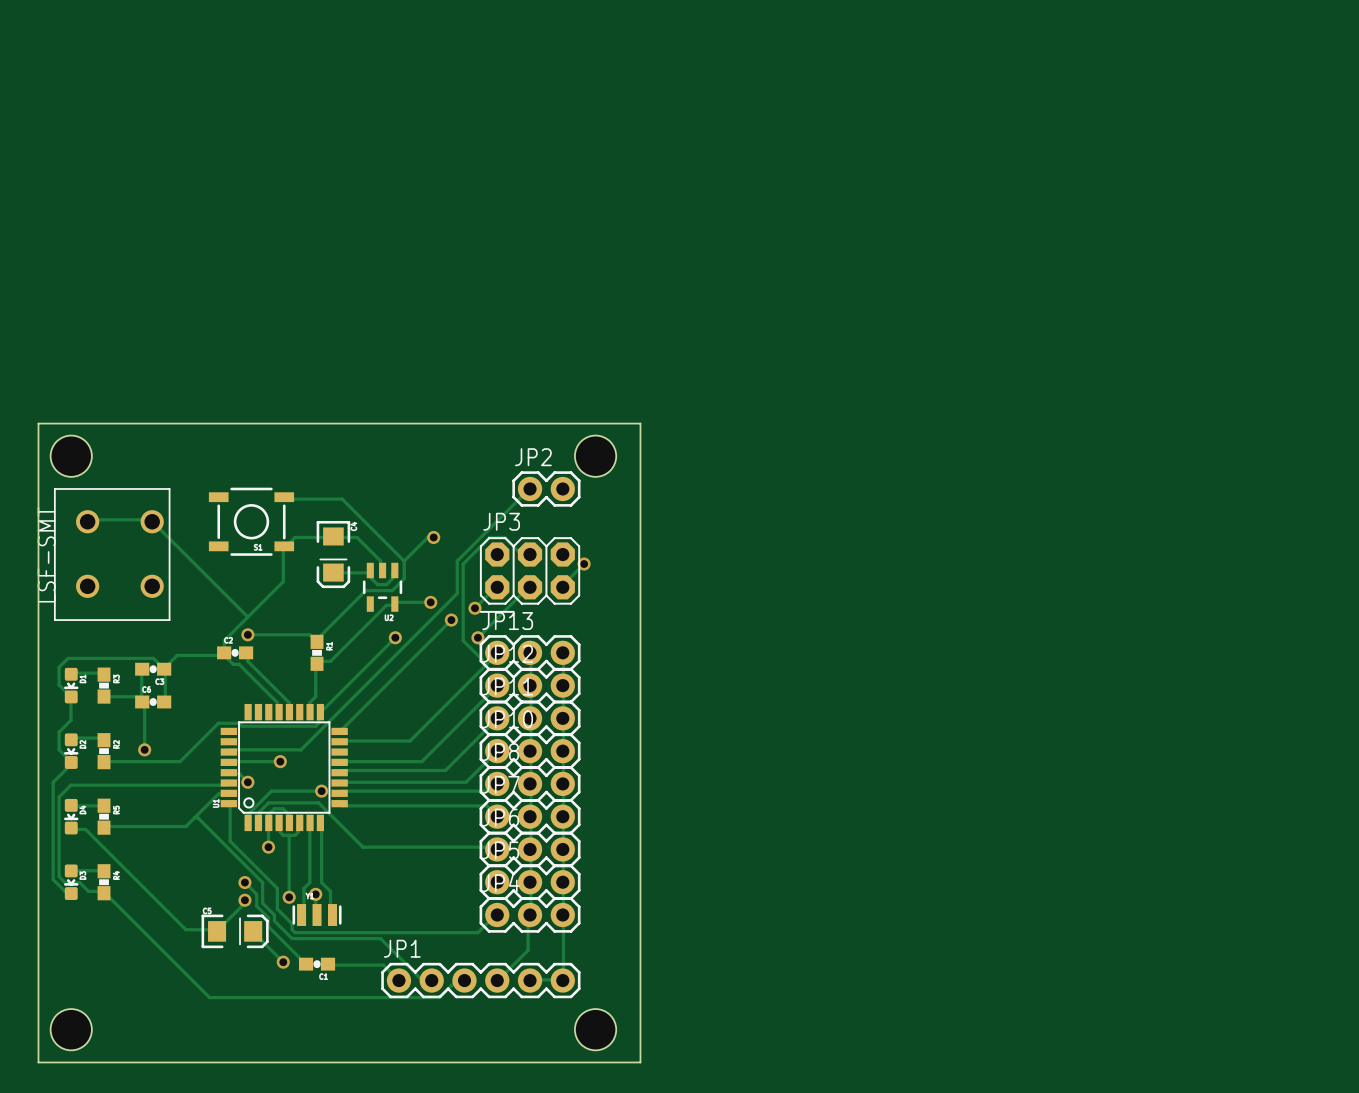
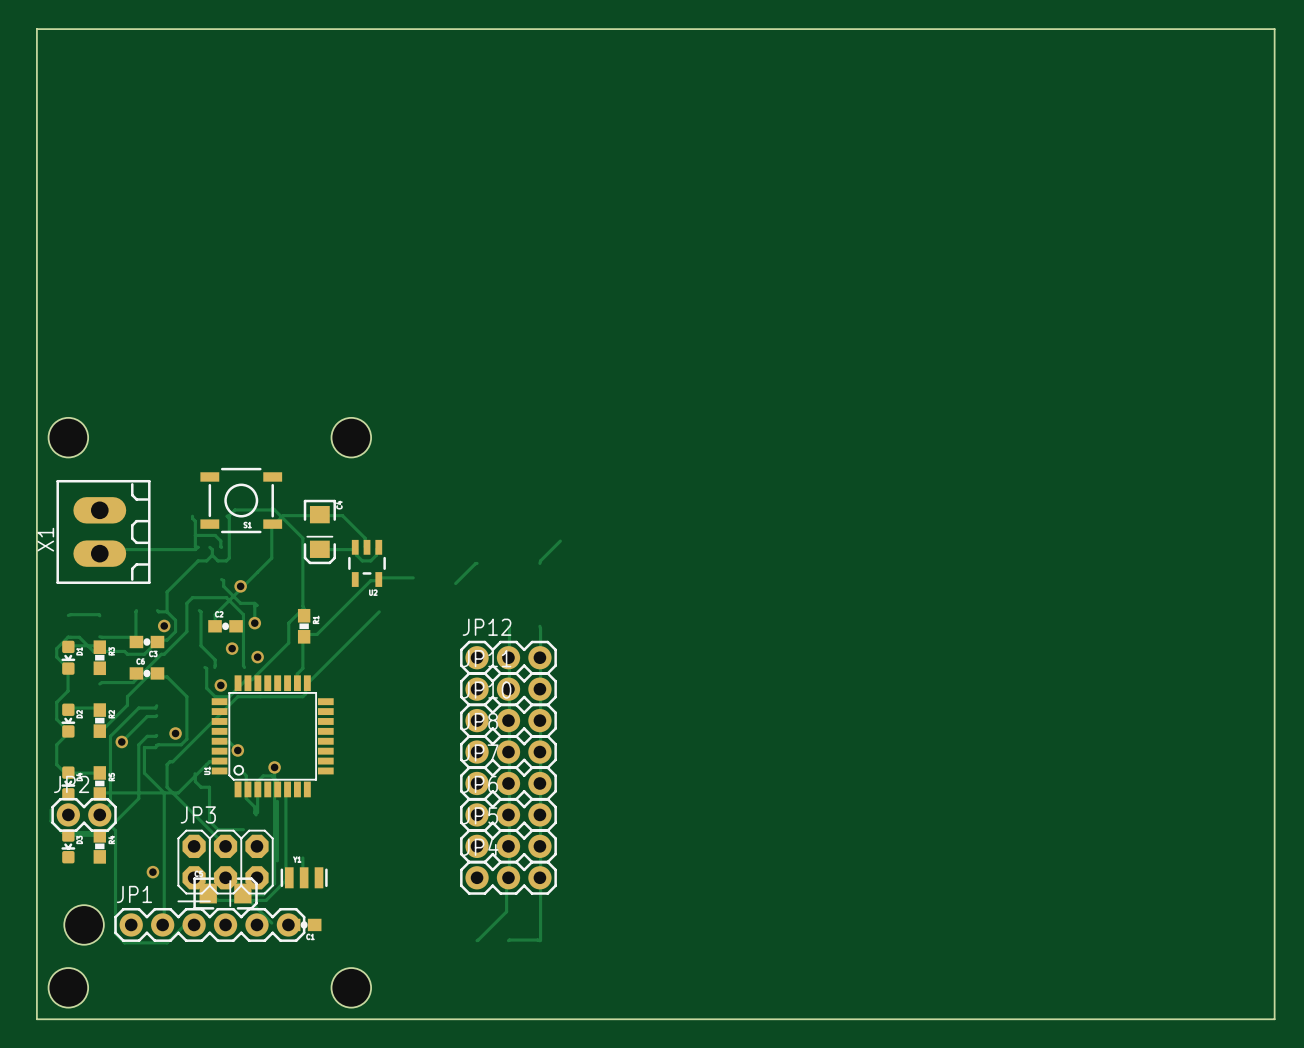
board edge: (38, 423) (640, 423) (640, 1062) -> (36, 406) (36, 29) (1274, 29) (1274, 1019) (614, 1019)
hole position: (595, 456) -> (351, 437)
track: (530, 488) (457, 561) (457, 593) (300, 749) (230, 749) (228, 752) -> none
JP2 position: (546, 488) -> (84, 814)
track: (284, 497) (286, 499) (342, 499) (404, 561) -> none
track: (87, 521) (88, 519) (150, 519) (247, 617) -> none
track: (433, 537) (427, 537) (404, 561) -> none
via: (433, 537) -> none
track: none -> (192, 516) (195, 521) (195, 546) (198, 547) (195, 549) (104, 549) (99, 553)
X1: none -> (103, 531)
part: (112, 554) -> none
track: (530, 554) (528, 552) (519, 552) (504, 537) (489, 537) (463, 564) (463, 640) (486, 664) -> none
track: none -> (195, 535) (215, 535) (220, 541) (221, 547)
track: (404, 561) (404, 578) (392, 590) (365, 590) (315, 640) -> none
via: (584, 564) -> none
track: none -> (209, 547) (212, 549) (212, 555)
JP3 position: (530, 575) -> (225, 866)
track: none -> (212, 555) (218, 560) (226, 560) (229, 558) (229, 518) (227, 516) (234, 509) (271, 509) (272, 508) (302, 538) (304, 608) (288, 623) (288, 642) (251, 679) (246, 679) (229, 696) (215, 696) (206, 688) (206, 668) (204, 667)
track: none -> (212, 555) (206, 560) (198, 560) (167, 592) (167, 611)
track: (530, 587) (477, 637) -> none
via: (430, 602) -> none
track: none -> (221, 579) (223, 580) (223, 586) (240, 603) (254, 603) (256, 605) (254, 606) (254, 623)
via: (474, 608) -> none
via: none -> (240, 586)
track: (451, 620) (339, 731) -> none
via: (451, 620) -> none
track: (247, 634) (309, 634) (315, 640) -> none
via: (247, 634) -> none
track: none -> (136, 610) (136, 642) (135, 637) (99, 636)
track: none -> (157, 610) (167, 611)
track: none -> (199, 610) (201, 611) (201, 645) (215, 659) (214, 667)
via: (395, 637) -> none
via: (477, 637) -> none
track: none -> (68, 615) (99, 615)
via: none -> (254, 623)
via: none -> (164, 625)
track: (246, 652) (247, 661) (289, 702) (289, 712) -> none
track: (497, 652) (410, 740) (339, 741) -> none
JP13: (530, 652) -> none
track: (165, 667) (177, 655) (221, 655) (224, 652) (233, 664) (239, 664) (277, 702) (277, 711) (279, 712) -> (158, 640) (167, 640) (175, 631) (175, 620) (167, 611)
track: (142, 669) (142, 701) -> none
track: (59, 676) (59, 667) (67, 658) (153, 658) (165, 670) (164, 701) -> (56, 648) (68, 637) (79, 637) (93, 651) (124, 651) (127, 654) (144, 654) (157, 642)
via: none -> (232, 648)
via: none -> (257, 657)
track: (497, 685) (421, 761) (339, 762) -> none
track: none -> (244, 667) (243, 614) (226, 597) (192, 597) (186, 603) (186, 631) (164, 654) (161, 654) (133, 682) (99, 683)
track: (104, 696) (141, 696) (142, 701) -> none
track: (142, 701) (144, 702) (144, 749) -> none
via: none -> (220, 685)
track: (497, 718) (445, 770) (342, 770) (339, 772) -> none
track: (247, 726) (241, 726) (239, 723) (218, 723) (180, 761) (106, 761) -> (237, 696) (172, 761) (167, 764) (167, 787) (225, 846)
track: none -> (156, 705) (155, 708) (138, 708) (110, 736) (110, 804) (99, 814)
track: none -> (156, 715) (147, 716) (121, 741)
via: (144, 749) -> none
track: (497, 751) (466, 782) (339, 783) -> none
track: none -> (101, 730) (127, 705) (127, 696) (147, 676) (167, 676) (186, 696) (186, 739) (181, 744) (158, 744) (155, 747) (144, 747) (144, 773) (164, 792) (164, 923) (162, 924)
track: (280, 761) (228, 762) -> none
via: (280, 761) -> none
via: none -> (175, 733)
via: none -> (121, 741)
track: (59, 776) (53, 782) (53, 844) -> (56, 744) (56, 764) (68, 778)
track: (228, 783) (227, 785) (70, 785) (59, 797) (59, 876) (65, 882) (79, 882) (88, 891) (103, 891) (209, 997) (439, 997) (454, 982) (463, 982) (464, 980) -> none
track: (497, 783) (489, 791) (342, 791) (339, 793) -> none
track: (321, 791) (271, 791) (247, 814) (248, 822) -> none
via: (321, 791) -> none
track: none -> (274, 767) (274, 883) (263, 894) (249, 894) (232, 877) (225, 877)
via: none -> (274, 767)
track: (228, 803) (230, 841) (277, 888) (277, 909) (292, 923) (292, 929) (295, 932) (477, 932) (497, 915) -> none
track: (339, 803) (342, 805) (486, 805) (497, 816) -> none
track: none -> (194, 773) (195, 781) (201, 787) (209, 787) (209, 821) (218, 829) (243, 829)
track: none -> (244, 773) (246, 775) (246, 798) (254, 807) (256, 814)
track: (194, 817) (197, 817) (262, 882) (262, 903) (274, 915) (274, 920) (292, 938) (380, 938) (421, 979) (431, 980) -> none
track: (258, 822) (259, 811) (268, 802) (318, 802) (362, 847) (495, 847) (497, 849) -> none
track: (279, 822) (280, 832) (283, 835) (295, 835) (298, 832) -> (194, 877) (218, 900) (266, 900) (285, 880) (285, 798)
track: (310, 822) (309, 882) (303, 888) (303, 915) (301, 915) -> none
track: (320, 822) (321, 882) (330, 891) (330, 915) (332, 915) -> none
track: (71, 828) (85, 829) (185, 929) (215, 929) (217, 931) (244, 903) (244, 900) -> none
via: (268, 847) -> none
track: (53, 856) (53, 879) (65, 891) (70, 891) (71, 893) -> (51, 821) (62, 832) (104, 832) (138, 798) (138, 744) (147, 736) (156, 735)
track: none -> (111, 826) (115, 830) (115, 933) (124, 942) (167, 942) (184, 925) (194, 924)
track: (244, 882) (256, 894) (256, 906) (268, 917) (268, 926) (306, 964) -> none
via: (244, 882) -> none
via: (315, 894) -> none
via: (289, 897) -> none
via: (244, 900) -> none
via: none -> (152, 872)
via: (283, 962) -> none
hole: none -> (84, 924)
track: (328, 964) (383, 965) (398, 980) -> none
JP1 position: (480, 980) -> (209, 924)
hole position: (595, 1029) -> (351, 987)

